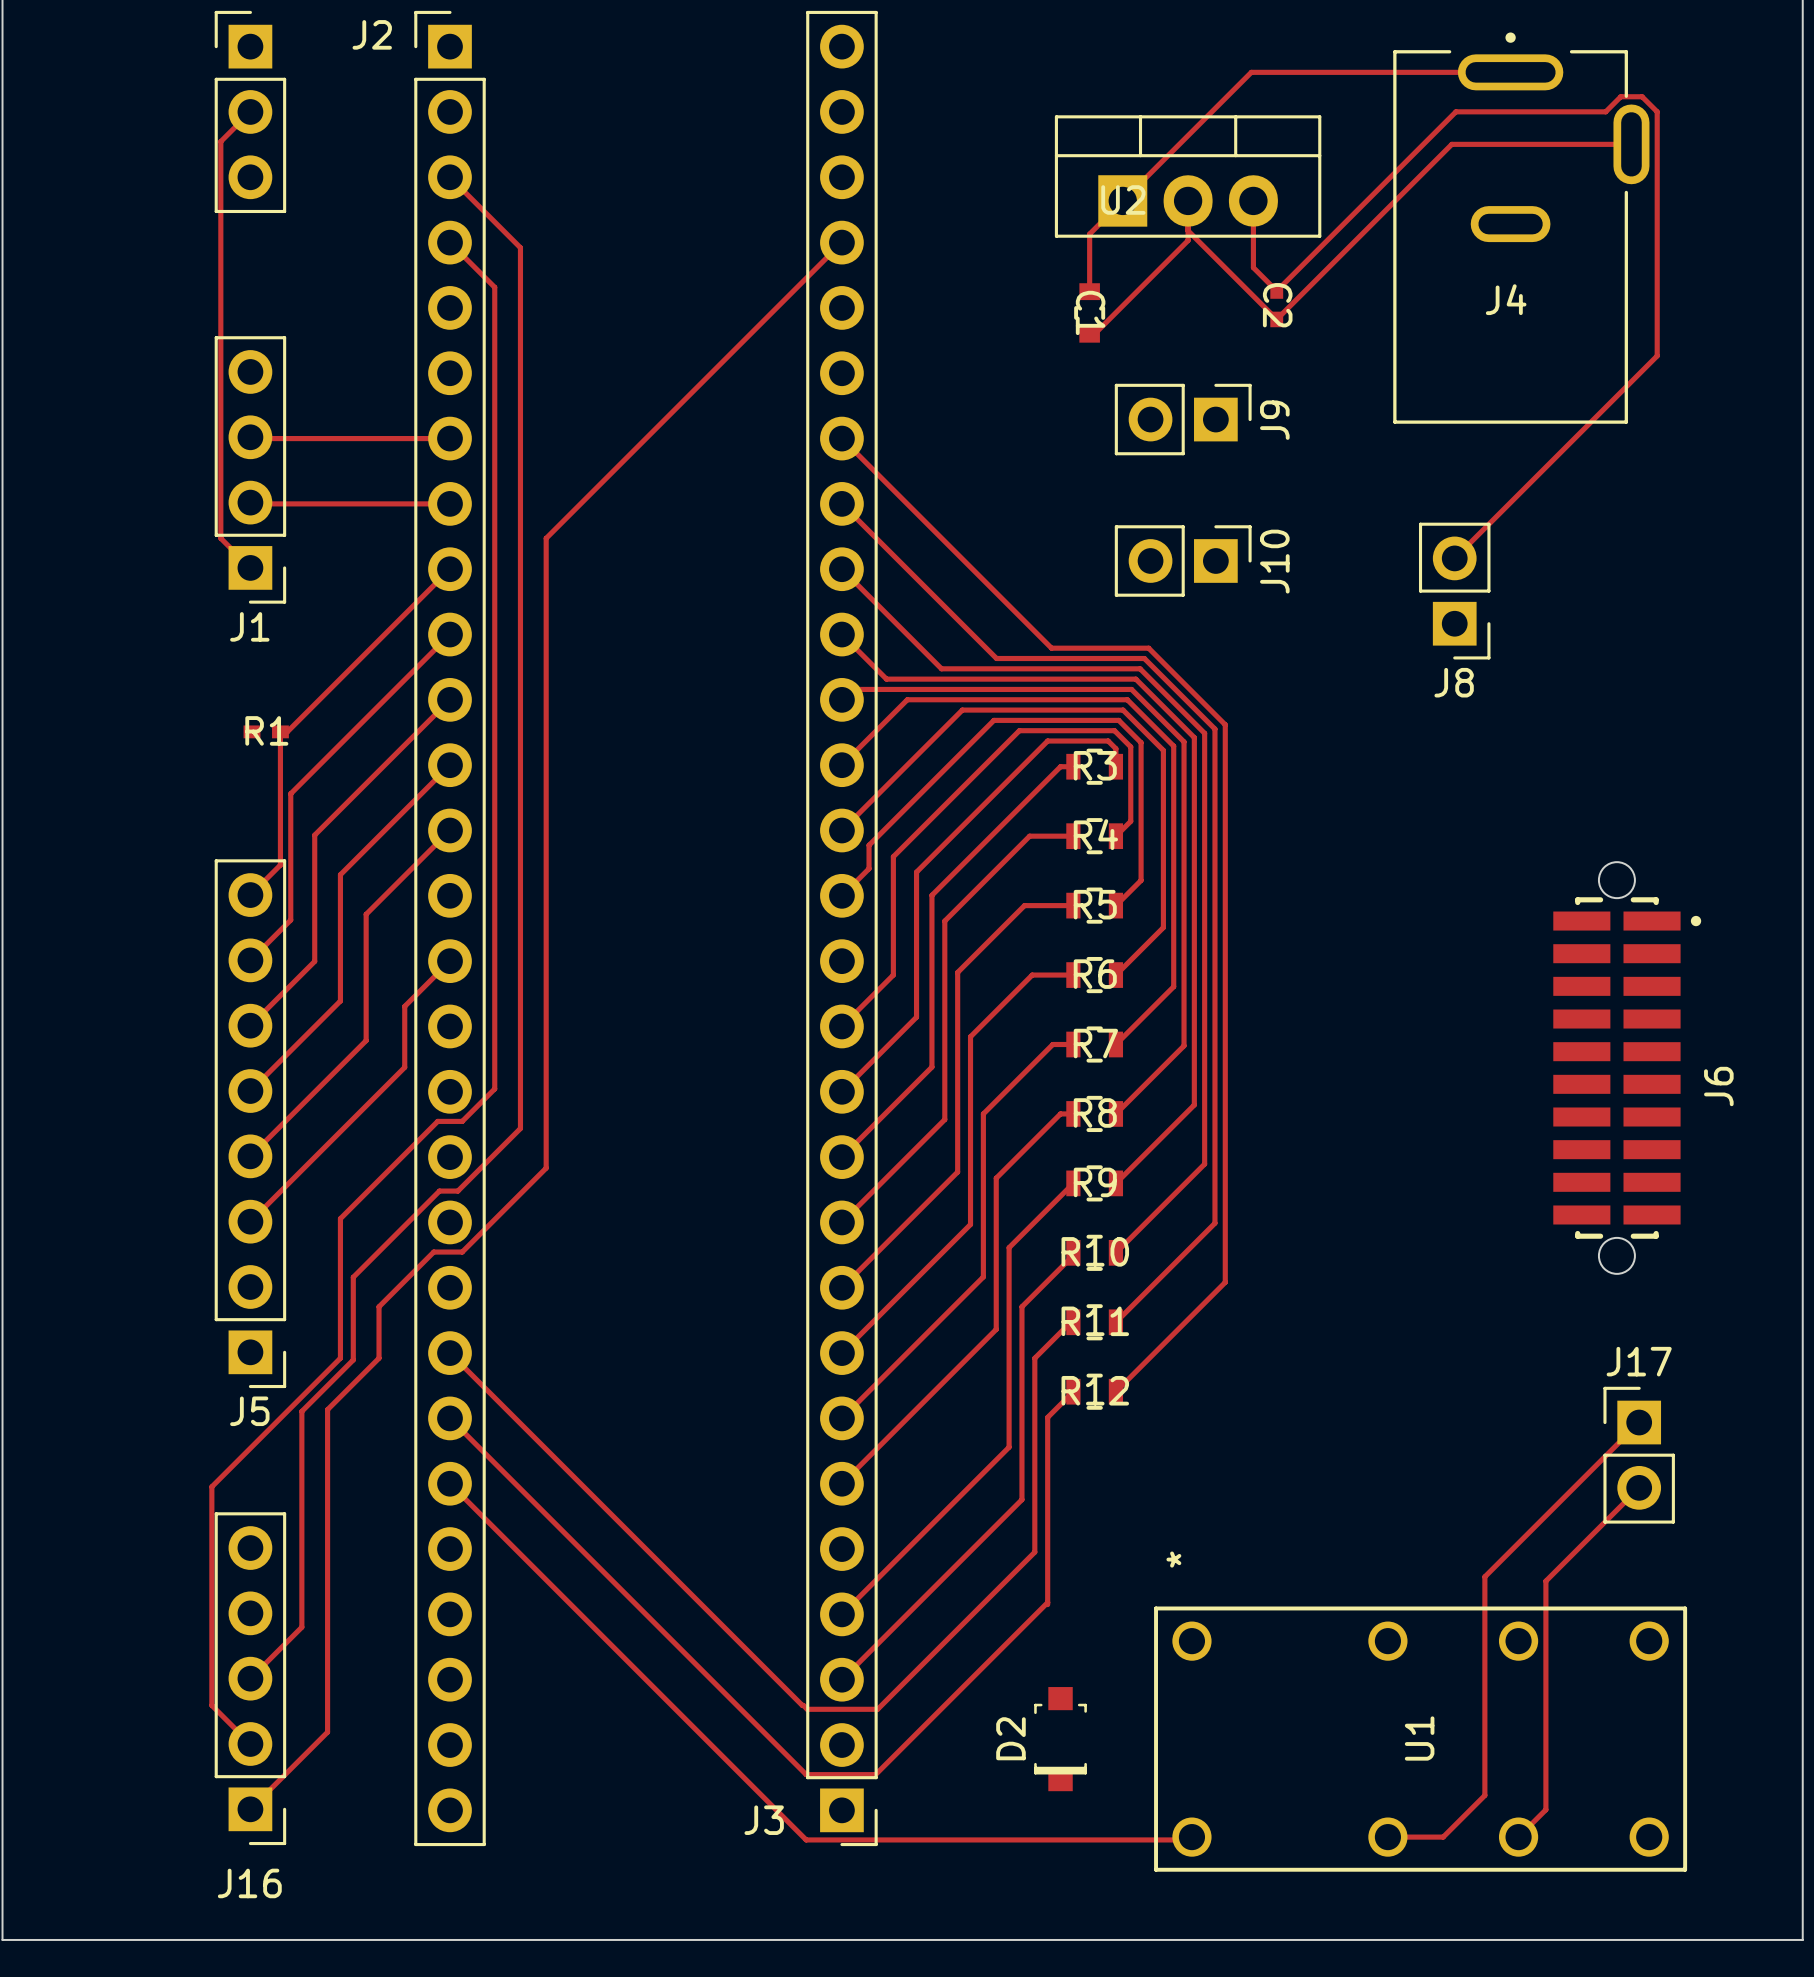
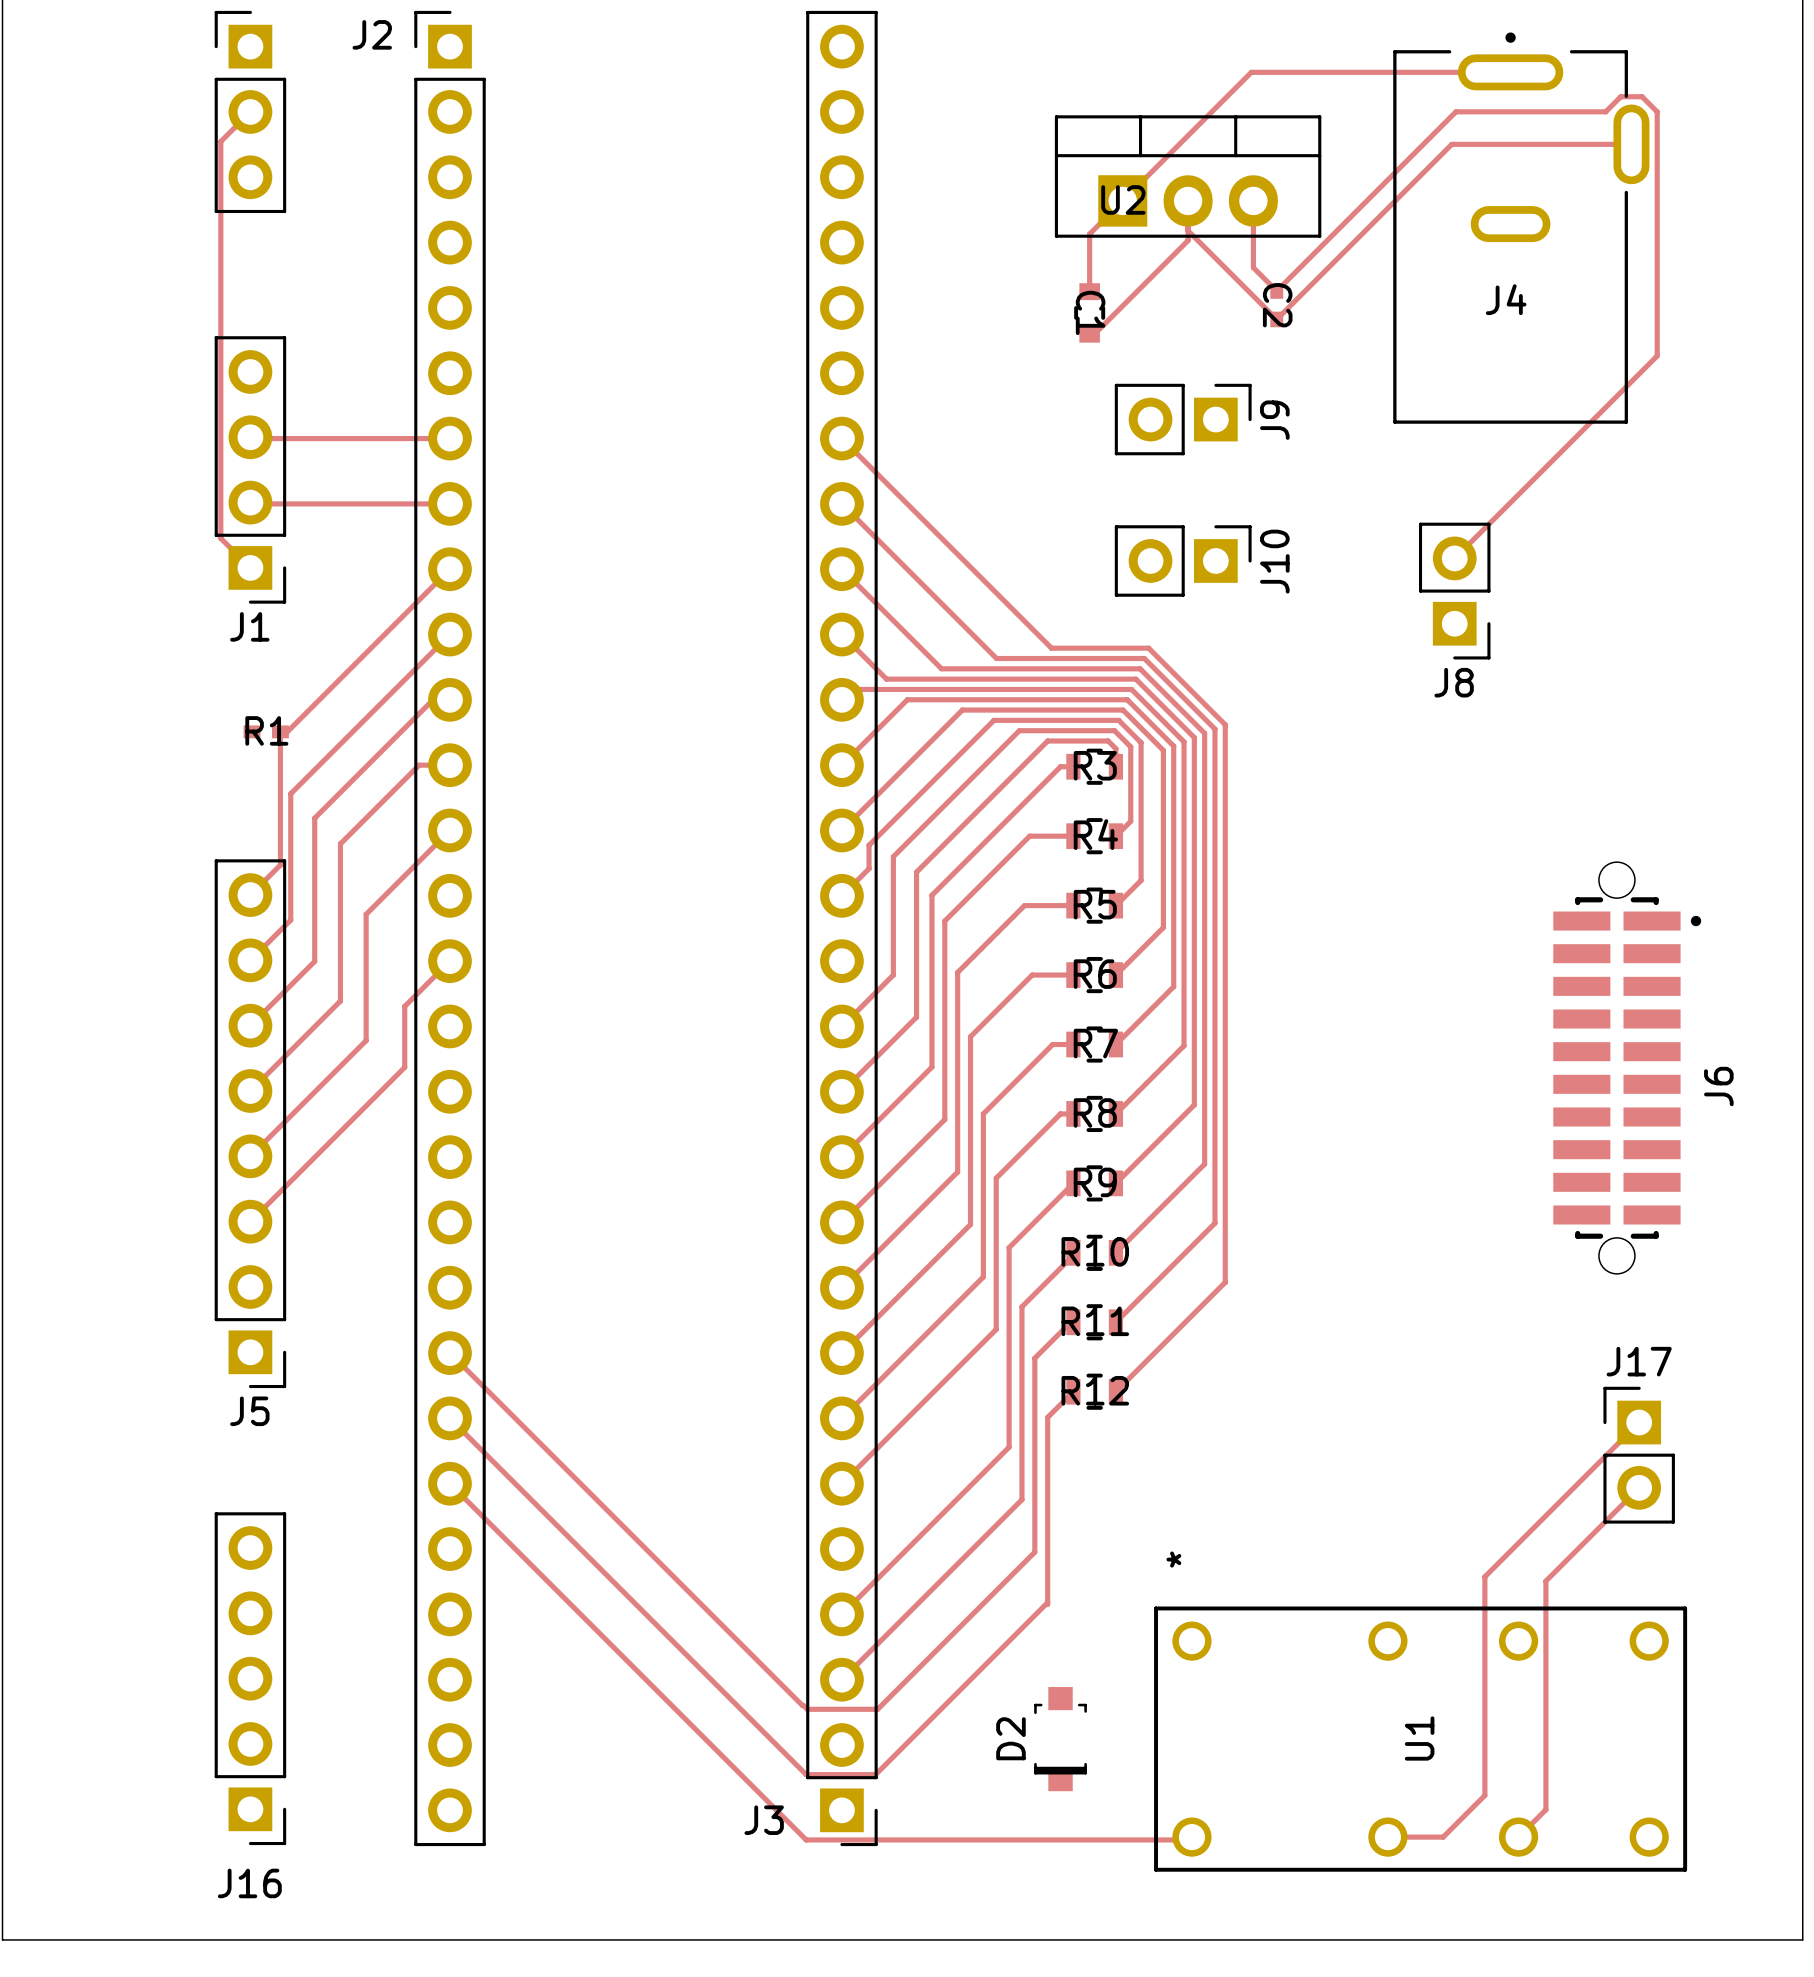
track: (450, 177) (520, 247) (520, 1128) (457, 1191) (439, 1191) (353, 1277) (353, 1359) (301, 1411) (301, 1627) (250, 1678) -> none
track: (450, 242) (494, 287) (494, 1088) (462, 1121) (437, 1121) (340, 1218) (340, 1358) (211, 1486) (211, 1705) (250, 1744) -> none
track: (841, 242) (546, 538) (546, 1168) (462, 1252) (433, 1252) (379, 1306) (379, 1358) (327, 1409) (327, 1732) (250, 1809) -> none
track: (450, 699) (314, 835) -> (450, 699) (433, 699) (314, 818) (314, 835)
track: (450, 765) (340, 874) -> (450, 765) (419, 765) (340, 843) (340, 874)

